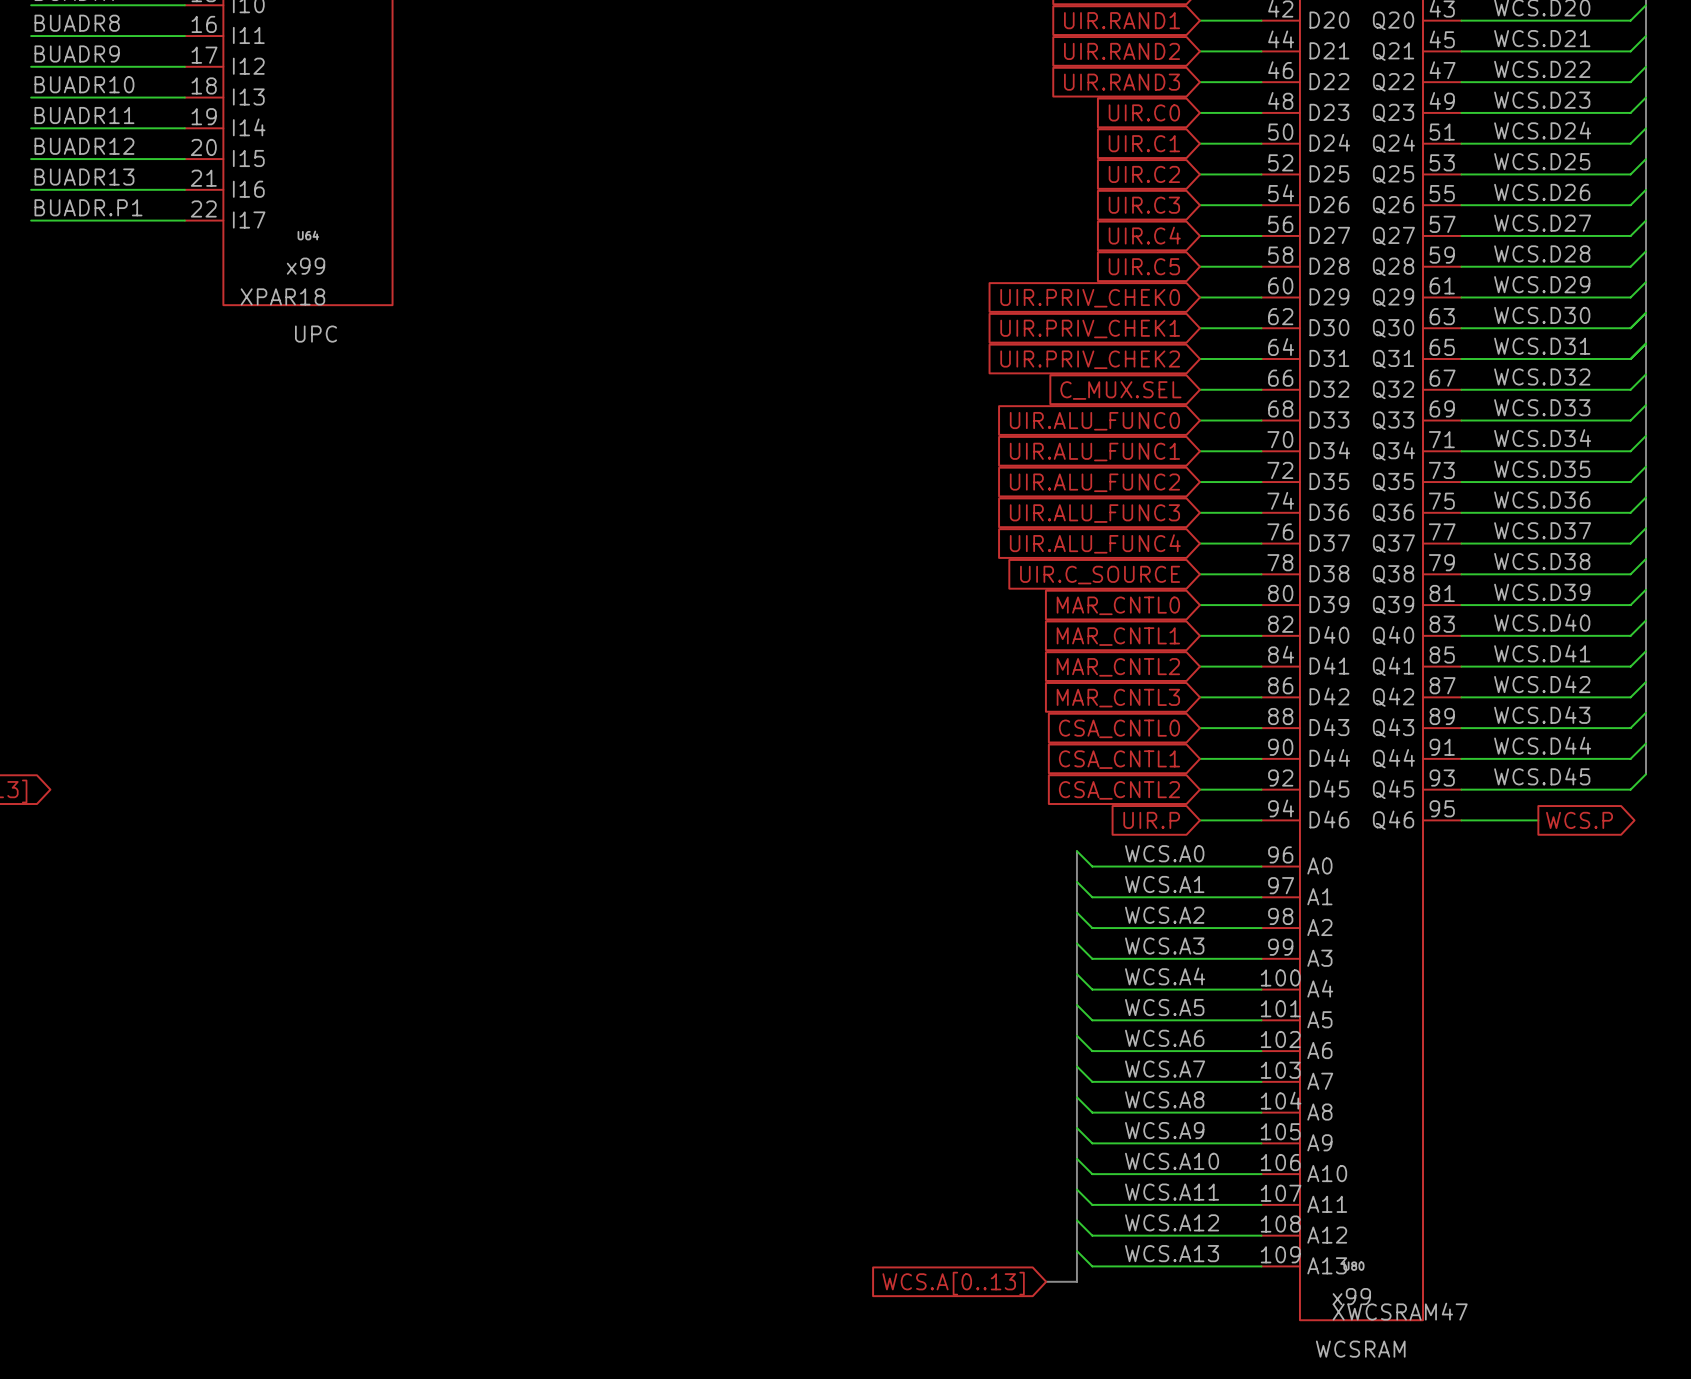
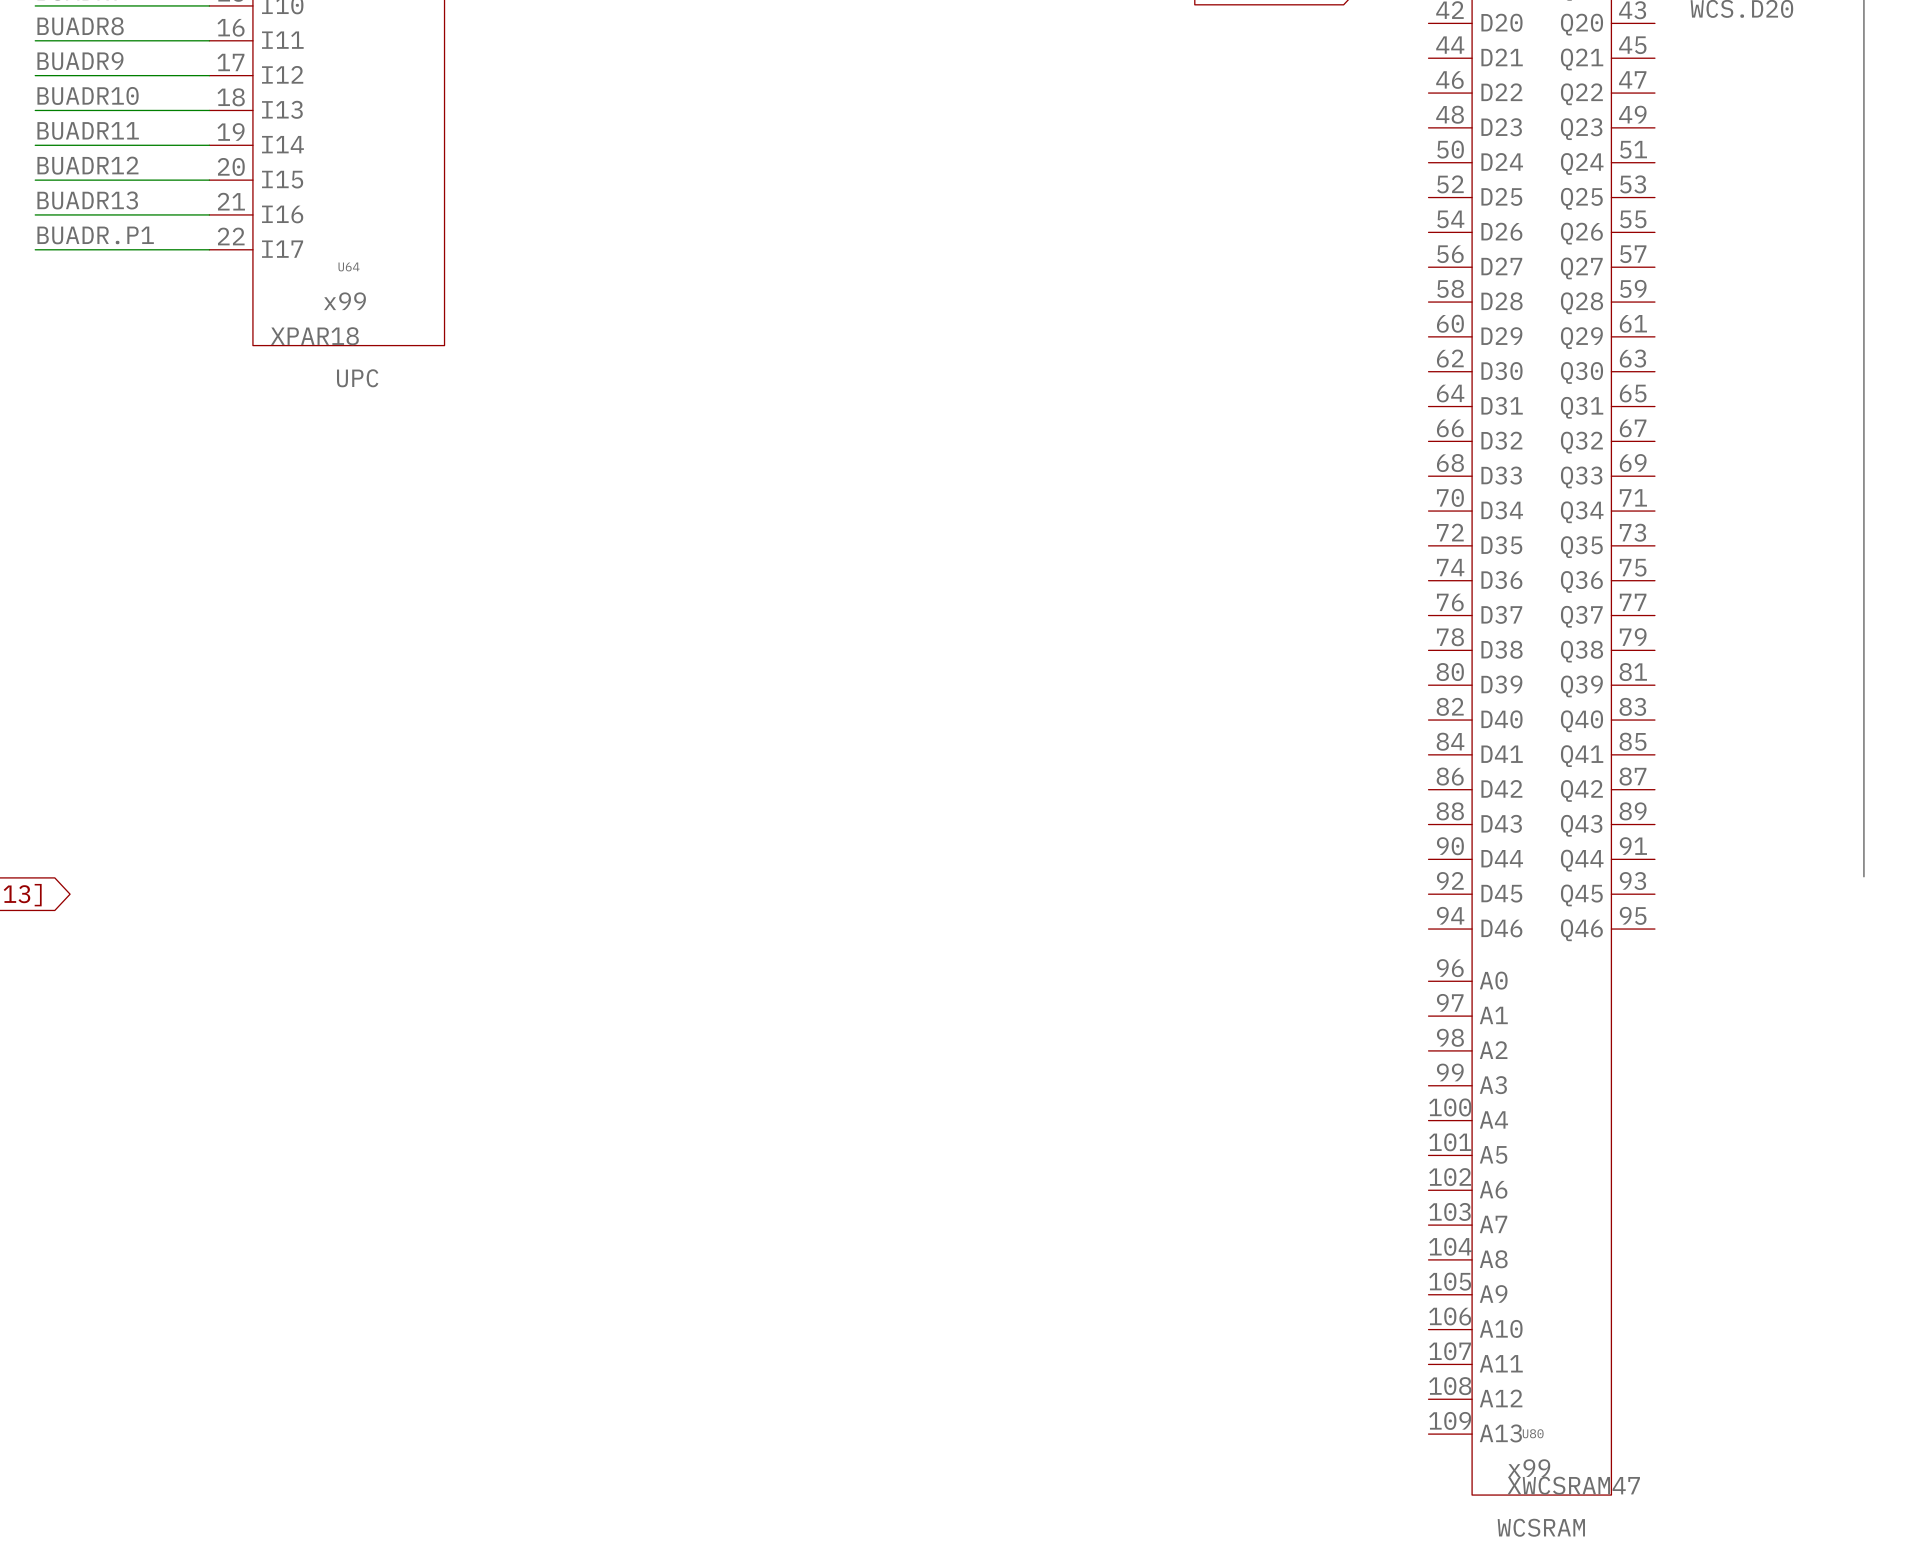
wire: (1646, 5) (1630, 20) (1461, 20) -> none
global label: UIR.RAND1 (1122, 20) -> none
wire: (1199, 20) (1261, 20) -> none
wire: (1646, 36) (1630, 51) (1461, 51) -> none
label: WCS.D21 (1542, 38) -> none
global label: UIR.RAND2 (1122, 51) -> none
wire: (1199, 51) (1261, 51) -> none
wire: (1646, 66) (1630, 82) (1461, 82) -> none
label: WCS.D22 (1542, 69) -> none
global label: UIR.RAND3 (1122, 82) -> none
wire: (1199, 82) (1261, 82) -> none
wire: (1646, 97) (1630, 112) (1461, 112) -> none
label: WCS.D23 (1542, 100) -> none
global label: UIR.C0 (1144, 112) -> none
wire: (1199, 112) (1261, 112) -> none
wire: (1646, 128) (1630, 143) (1461, 143) -> none
label: WCS.D24 (1542, 130) -> none
global label: UIR.C1 (1144, 143) -> none
wire: (1199, 143) (1261, 143) -> none
wire: (1646, 159) (1630, 174) (1461, 174) -> none
label: WCS.D25 (1542, 161) -> none
global label: UIR.C2 (1144, 174) -> none
wire: (1199, 174) (1261, 174) -> none
wire: (1646, 189) (1630, 205) (1461, 205) -> none
label: WCS.D26 (1542, 192) -> none
global label: UIR.C3 (1144, 205) -> none
wire: (1199, 205) (1261, 205) -> none
wire: (1646, 220) (1630, 235) (1461, 235) -> none
label: WCS.D27 (1542, 223) -> none
global label: UIR.C4 (1144, 235) -> none
wire: (1199, 235) (1261, 235) -> none
wire: (1646, 251) (1630, 266) (1461, 266) -> none
label: WCS.D28 (1542, 253) -> none
global label: UIR.C5 (1144, 266) -> none
wire: (1199, 266) (1261, 266) -> none
wire: (1646, 282) (1630, 297) (1461, 297) -> none
label: WCS.D29 (1542, 284) -> none
wire: (1199, 297) (1261, 297) -> none
global label: UIR.PRIV_CHEK0 (1090, 298) -> none
wire: (1646, 312) (1630, 328) (1461, 328) -> none
label: WCS.D30 (1542, 315) -> none
global label: UIR.PRIV_CHEK1 (1090, 328) -> none
wire: (1199, 328) (1261, 328) -> none
wire: (1646, 343) (1630, 359) (1461, 359) -> none
label: WCS.D31 (1542, 346) -> none
global label: UIR.PRIV_CHEK2 (1090, 359) -> none
wire: (1199, 359) (1261, 359) -> none
wire: (1646, 374) (1630, 389) (1461, 389) -> none
label: WCS.D32 (1542, 376) -> none
wire: (1199, 389) (1261, 389) -> none
global label: C_MUX.SEL (1120, 390) -> none
wire: (1646, 405) (1630, 420) (1461, 420) -> none
label: WCS.D33 (1542, 407) -> none
wire: (1199, 420) (1261, 420) -> none
global label: UIR.ALU_FUNC0 (1094, 421) -> none
wire: (1646, 435) (1630, 451) (1461, 451) -> none
label: WCS.D34 (1542, 438) -> none
wire: (1199, 451) (1261, 451) -> none
global label: UIR.ALU_FUNC1 (1094, 452) -> none
wire: (1646, 466) (1630, 482) (1461, 482) -> none
label: WCS.D35 (1542, 469) -> none
global label: UIR.ALU_FUNC2 (1094, 482) -> none
wire: (1199, 482) (1261, 482) -> none
wire: (1646, 497) (1630, 512) (1461, 512) -> none
label: WCS.D36 (1542, 500) -> none
wire: (1199, 512) (1261, 512) -> none
global label: UIR.ALU_FUNC3 (1094, 513) -> none
wire: (1646, 528) (1630, 543) (1461, 543) -> none
label: WCS.D37 (1542, 530) -> none
global label: UIR.ALU_FUNC4 (1095, 543) -> none
wire: (1199, 543) (1261, 543) -> none
wire: (1646, 558) (1630, 574) (1461, 574) -> none
label: WCS.D38 (1542, 561) -> none
wire: (1199, 574) (1261, 574) -> none
global label: UIR.C_SOURCE (1100, 575) -> none
wire: (1646, 589) (1630, 605) (1461, 605) -> none
label: WCS.D39 (1542, 592) -> none
global label: MAR_CNTL0 (1118, 605) -> none
wire: (1199, 605) (1261, 605) -> none
wire: (1646, 620) (1630, 635) (1461, 635) -> none
label: WCS.D40 (1542, 622) -> none
wire: (1199, 635) (1261, 635) -> none
global label: MAR_CNTL1 (1118, 636) -> none
wire: (1646, 651) (1630, 666) (1461, 666) -> none
label: WCS.D41 (1542, 653) -> none
wire: (1199, 666) (1261, 666) -> none
global label: MAR_CNTL2 (1118, 667) -> none
wire: (1646, 681) (1630, 697) (1461, 697) -> none
label: WCS.D42 (1542, 684) -> none
wire: (1199, 697) (1261, 697) -> none
global label: MAR_CNTL3 (1118, 698) -> none
wire: (1646, 712) (1630, 728) (1461, 728) -> none
label: WCS.D43 (1542, 714) -> none
global label: CSA_CNTL0 (1119, 728) -> none
wire: (1199, 728) (1261, 728) -> none
wire: (1646, 743) (1630, 758) (1461, 758) -> none
label: WCS.D44 (1542, 745) -> none
wire: (1199, 758) (1261, 758) -> none
global label: CSA_CNTL1 (1119, 759) -> none
wire: (1646, 774) (1630, 789) (1461, 789) -> none
label: WCS.D45 (1542, 776) -> none
wire: (1199, 789) (1261, 789) -> none
global label: CSA_CNTL2 (1119, 790) -> none
global label: UIR.P (1151, 820) -> none
wire: (1199, 820) (1261, 820) -> none
wire: (1461, 820) (1538, 820) -> none
global label: WCS.P (1579, 820) -> none
wire: (1076, 851) (1092, 866) (1261, 866) -> none
bus: (1076, 851) (1076, 1281) (1046, 1281) -> none
label: WCS.A0 (1164, 853) -> none
wire: (1076, 881) (1092, 897) (1261, 897) -> none
label: WCS.A1 (1164, 884) -> none
wire: (1076, 912) (1092, 928) (1261, 928) -> none
label: WCS.A2 (1164, 915) -> none
wire: (1076, 943) (1092, 958) (1261, 958) -> none
label: WCS.A3 (1164, 946) -> none
wire: (1076, 974) (1092, 989) (1261, 989) -> none
label: WCS.A4 (1165, 976) -> none
wire: (1076, 1004) (1092, 1020) (1261, 1020) -> none
label: WCS.A5 (1164, 1007) -> none
wire: (1076, 1035) (1092, 1051) (1261, 1051) -> none
label: WCS.A6 (1164, 1038) -> none
wire: (1076, 1066) (1092, 1081) (1261, 1081) -> none
label: WCS.A7 (1165, 1069) -> none
wire: (1076, 1097) (1092, 1112) (1261, 1112) -> none
label: WCS.A8 (1164, 1099) -> none
wire: (1076, 1127) (1092, 1143) (1261, 1143) -> none
label: WCS.A9 (1164, 1130) -> none
wire: (1076, 1158) (1092, 1174) (1261, 1174) -> none
label: WCS.A10 (1172, 1161) -> none
wire: (1076, 1189) (1092, 1204) (1261, 1204) -> none
label: WCS.A11 (1172, 1192) -> none
wire: (1076, 1220) (1092, 1235) (1261, 1235) -> none
label: WCS.A12 (1172, 1222) -> none
wire: (1076, 1251) (1092, 1266) (1261, 1266) -> none
label: WCS.A13 (1172, 1253) -> none
global label: WCS.A[0..13] (953, 1283) -> none

